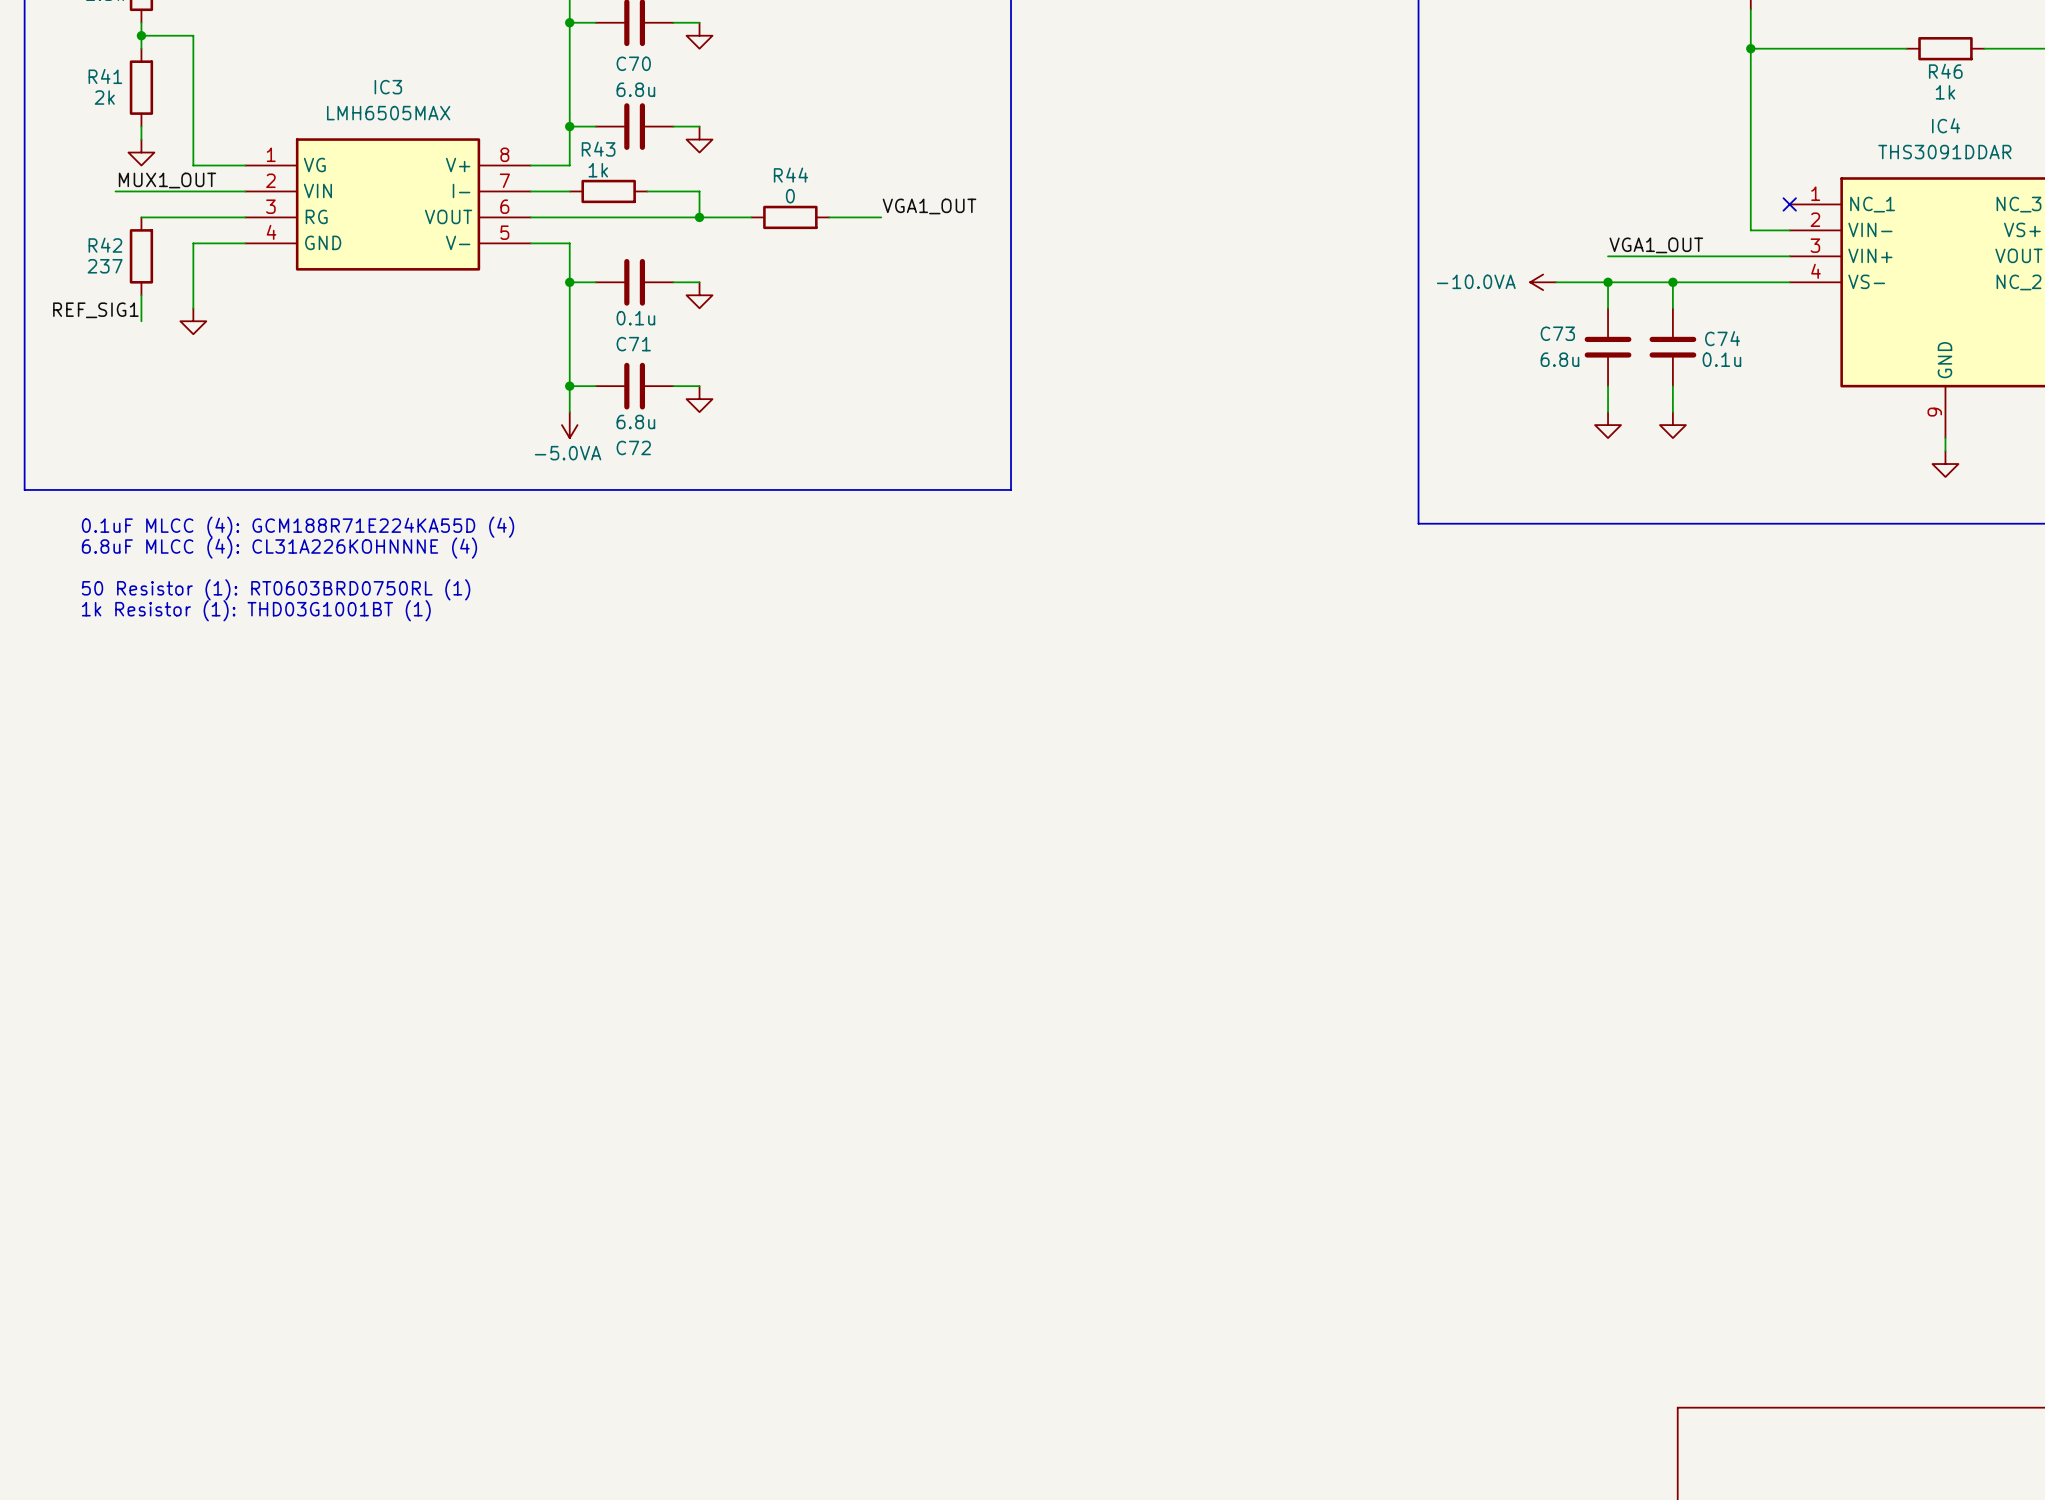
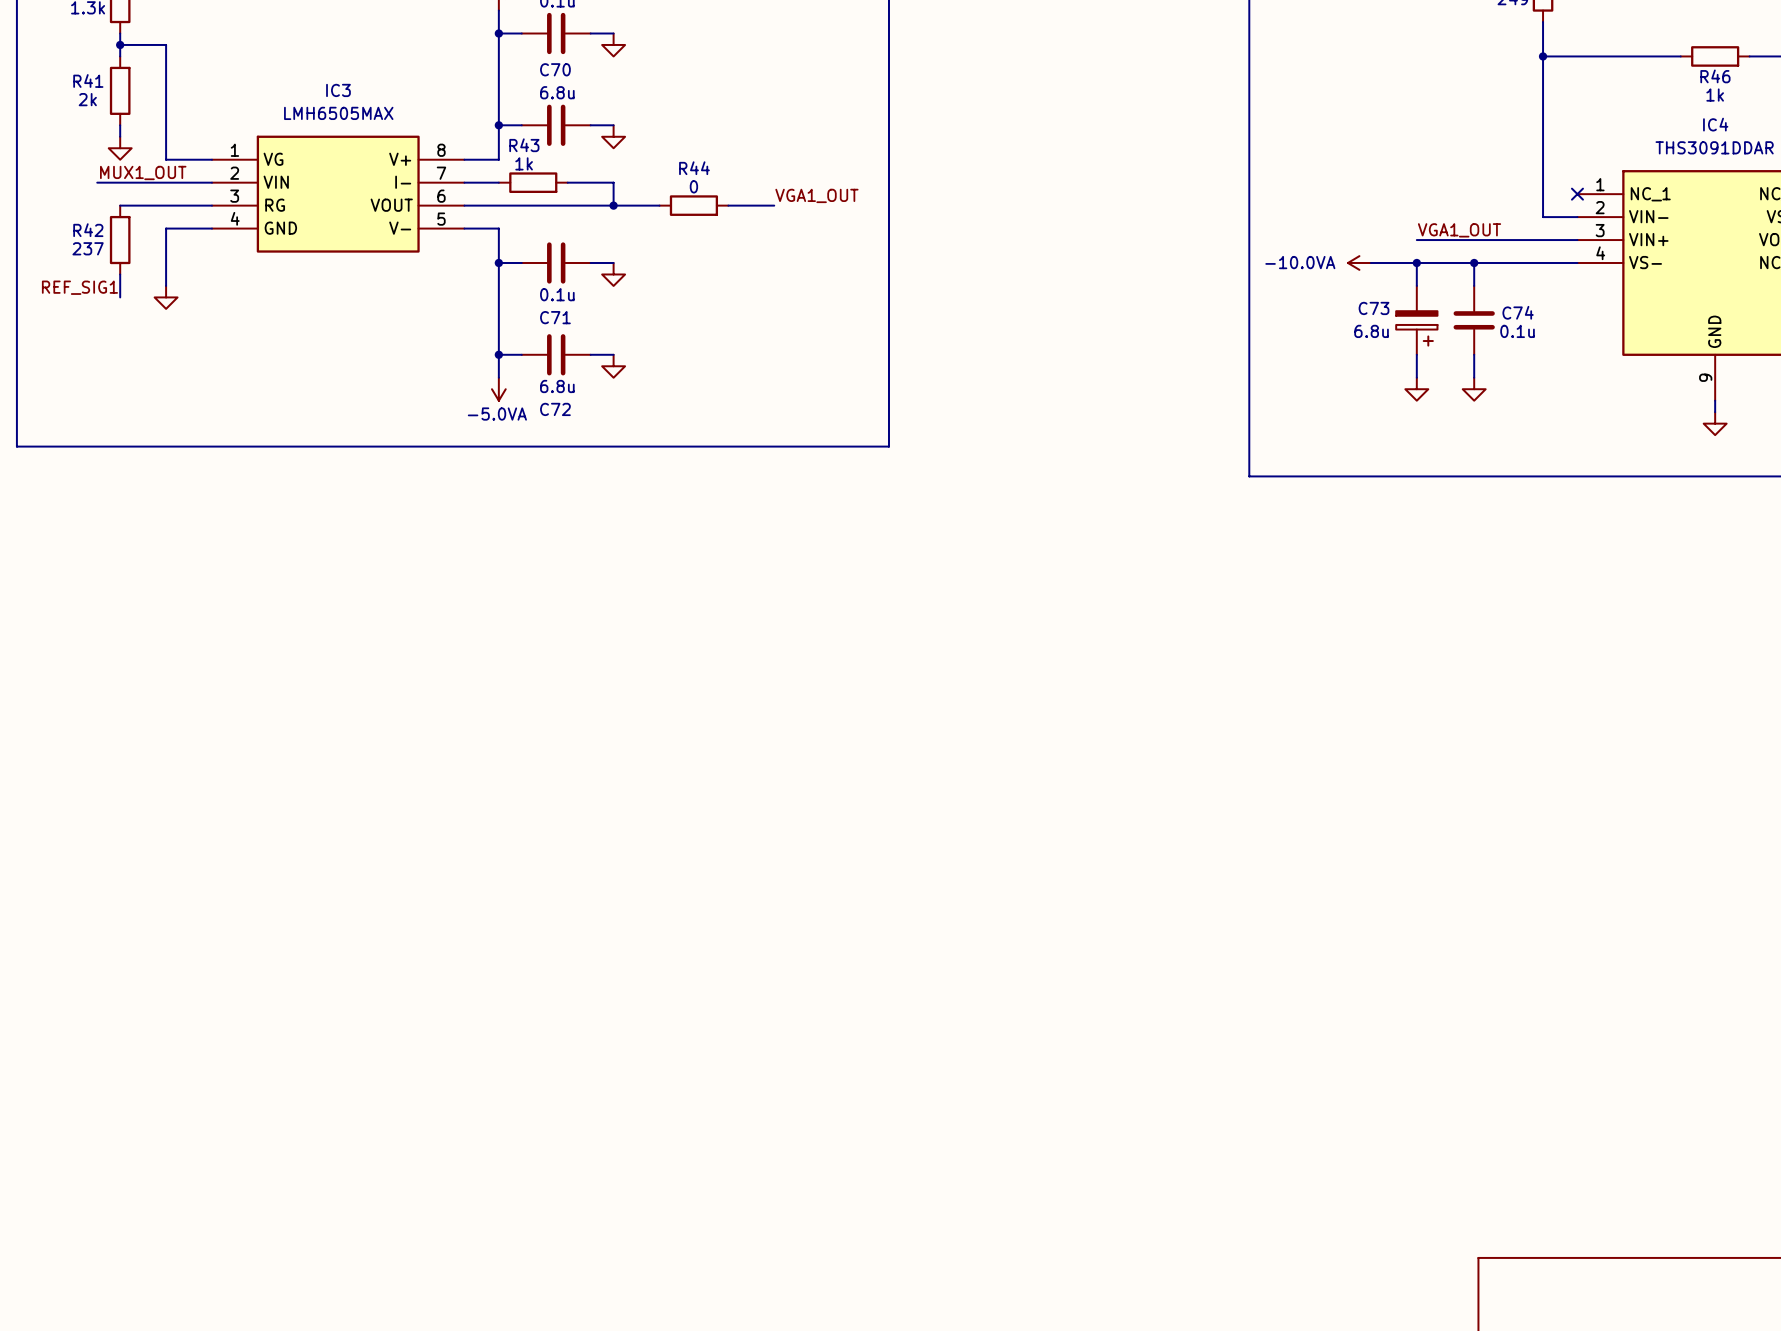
C73 symbol: [1584, 308, 1632, 387] -> [1396, 285, 1438, 355]
text: 0.1uF MLCC (4): GCM188R71E224KA55D (4) (298, 527) -> none
text: 6.8uF MLCC (4): CL31A226KOHNNNE (4) (279, 548) -> none
text: 50 Resistor (1): RT0603BRD0750RL (1) (276, 589) -> none
text: 1k Resistor (1): THD03G1001BT (1) (256, 610) -> none

